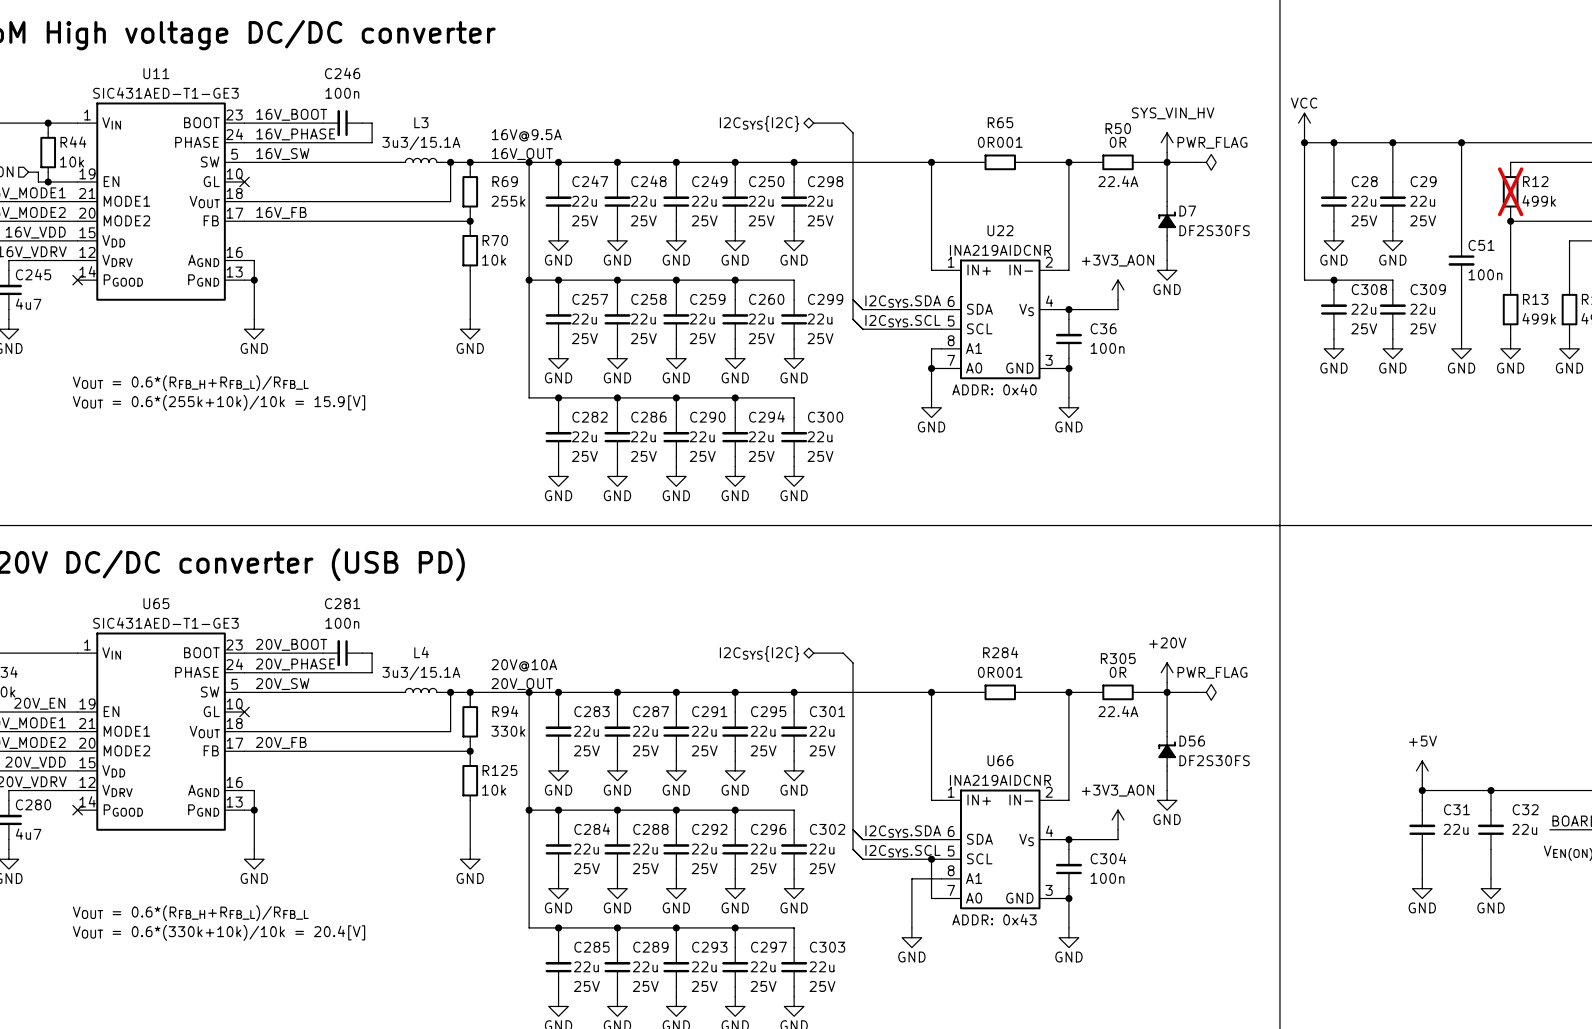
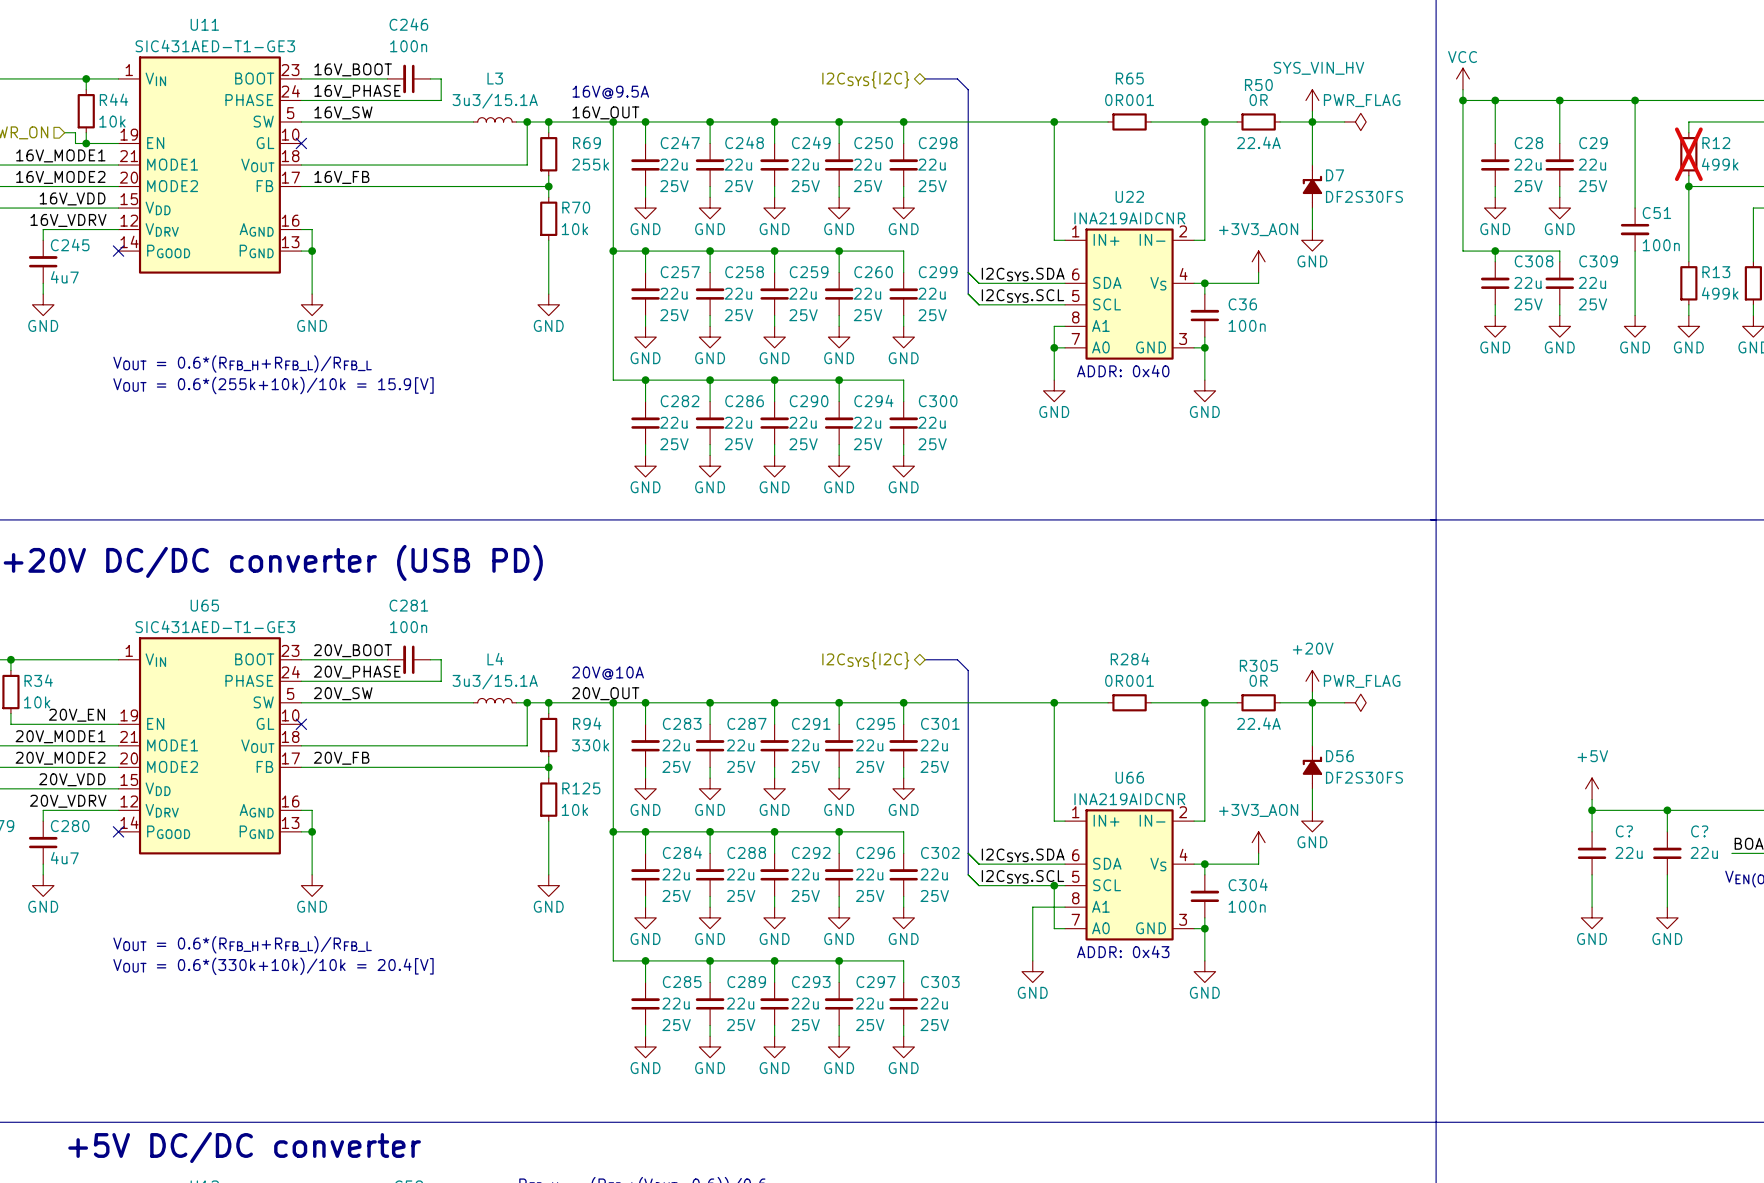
C31 name: C31 (1456, 809) -> C? (1624, 831)
C32 name: C32 (1525, 809) -> C? (1699, 831)

